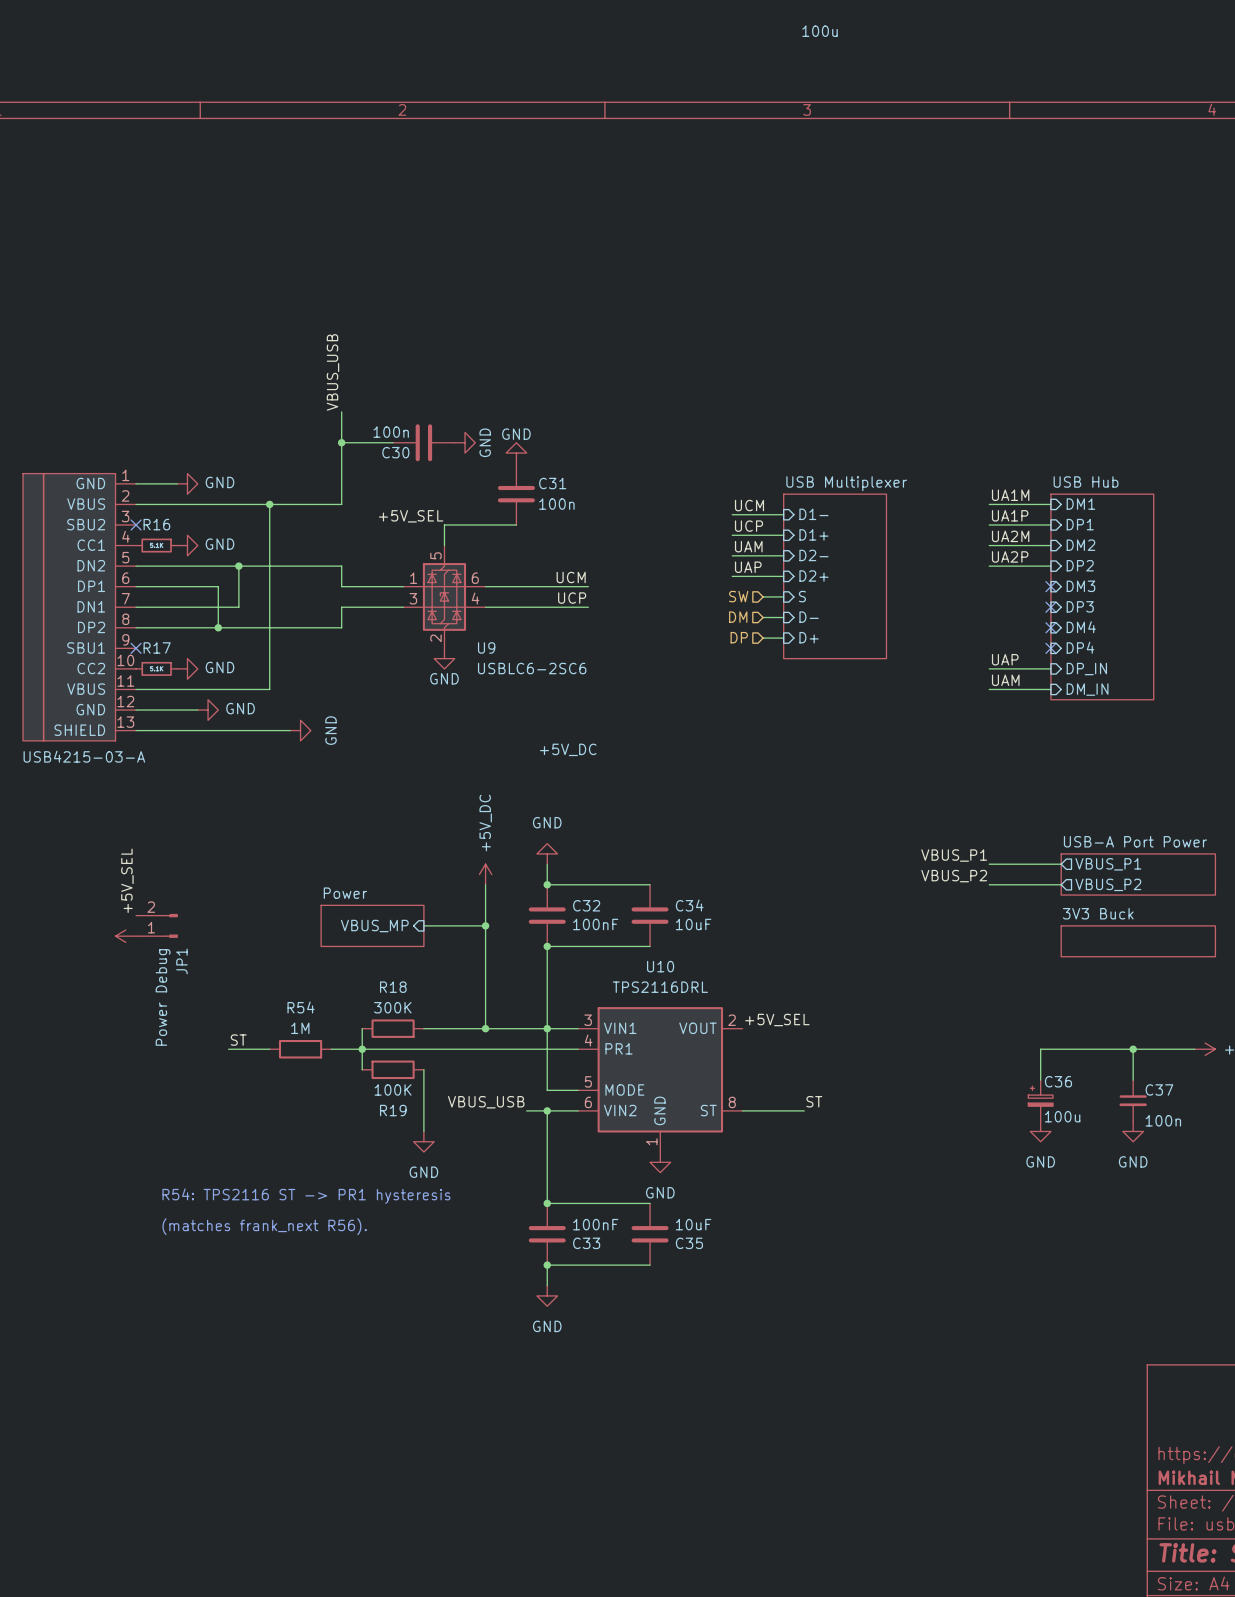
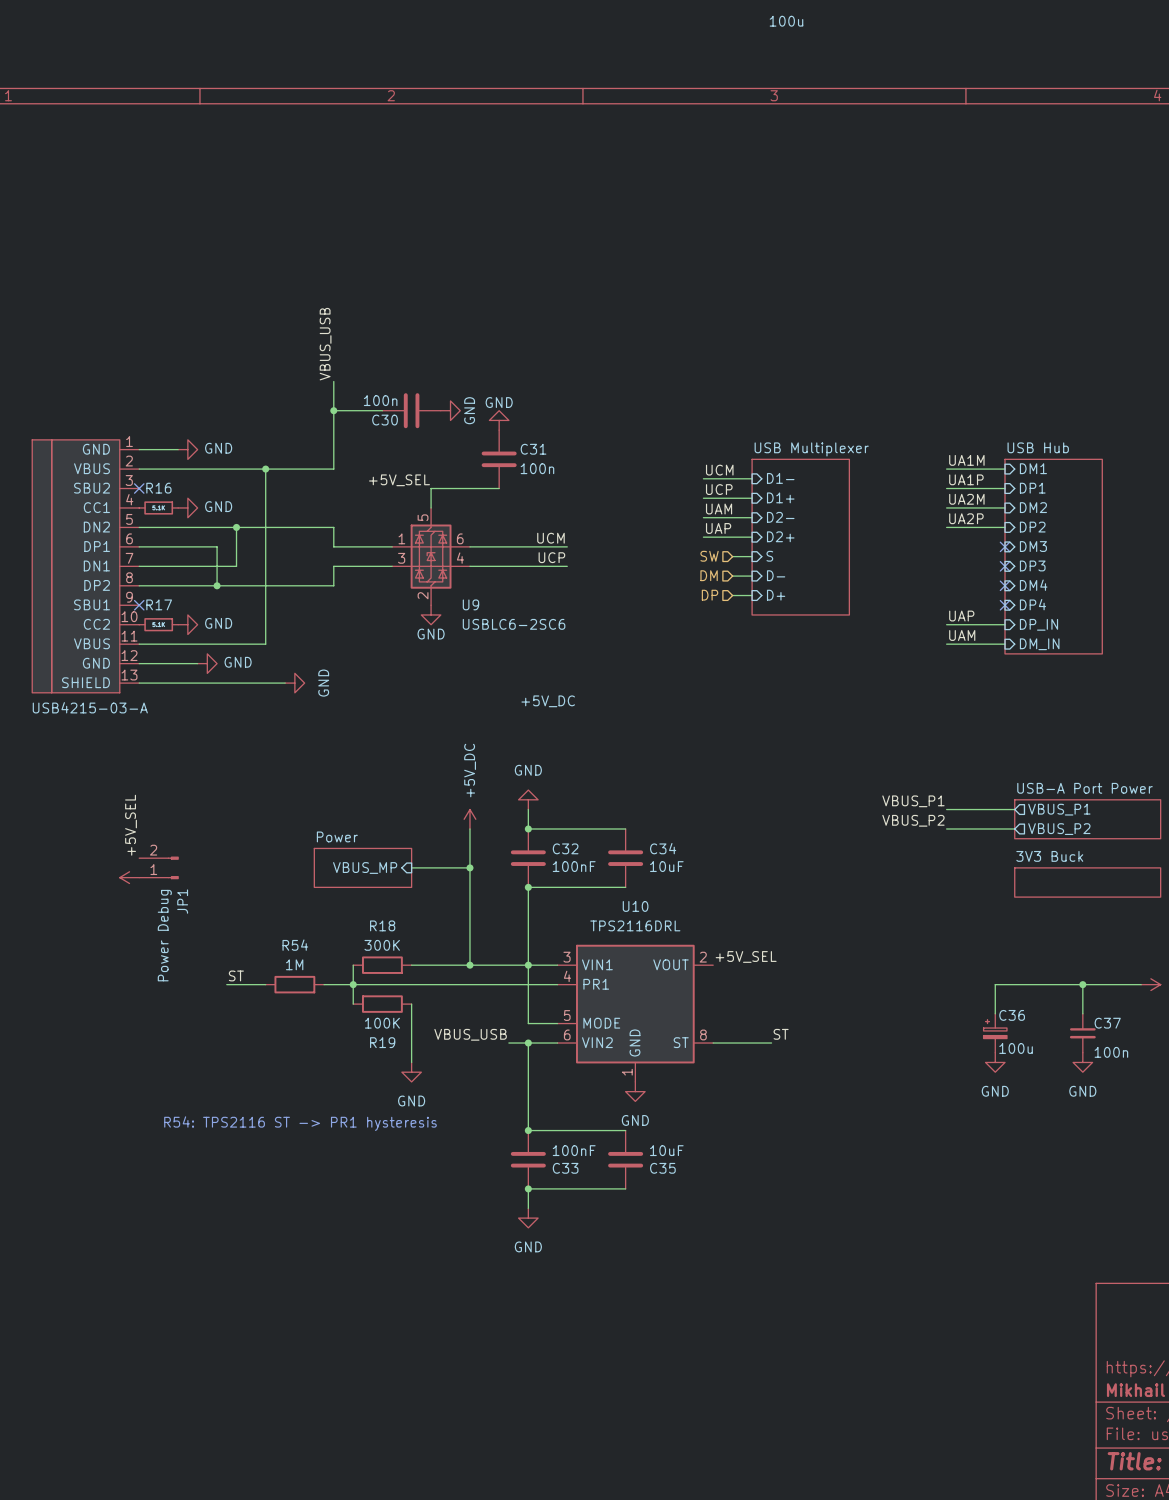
text: (matches frank_next R56). (264, 1226) -> none

